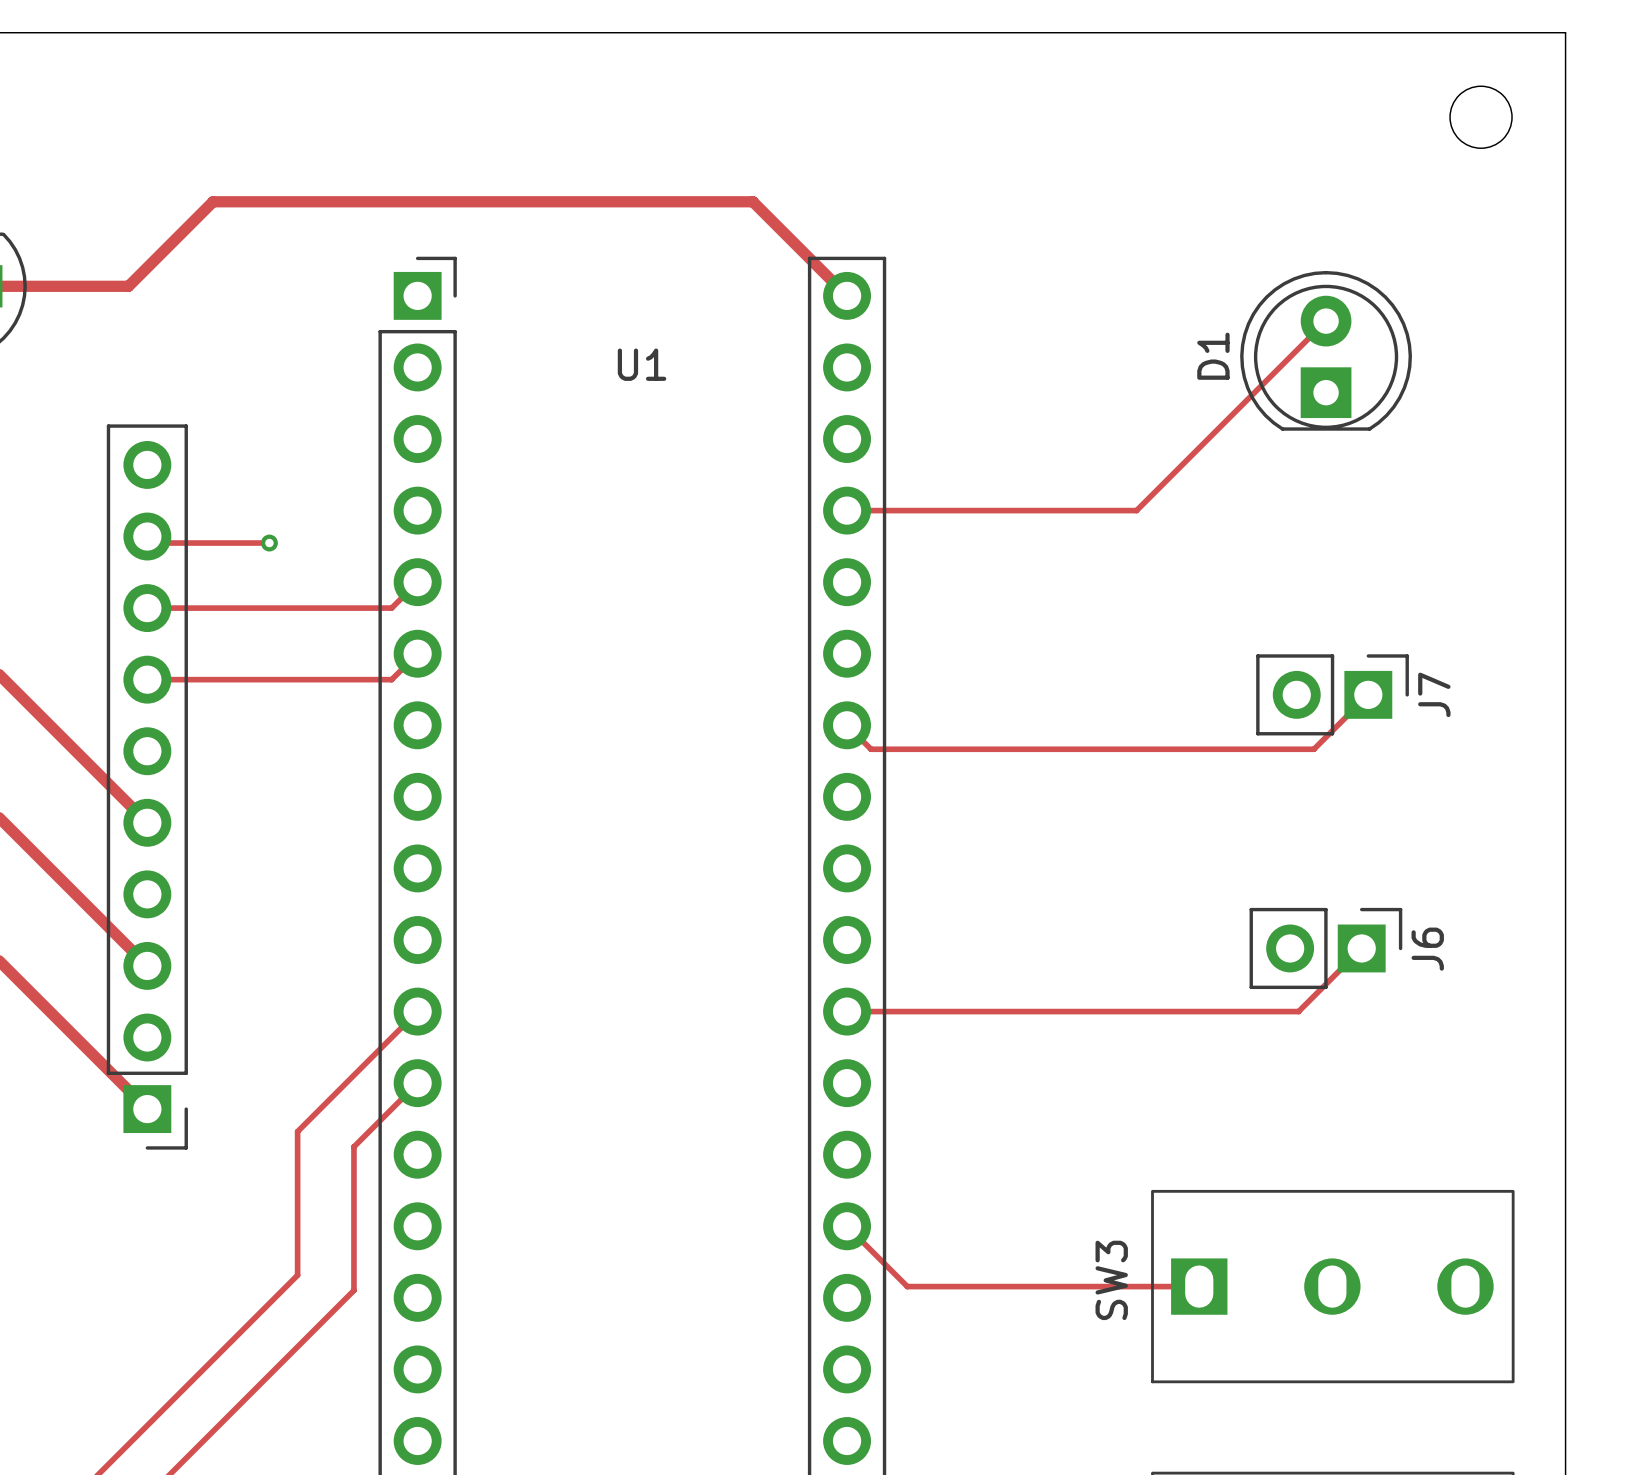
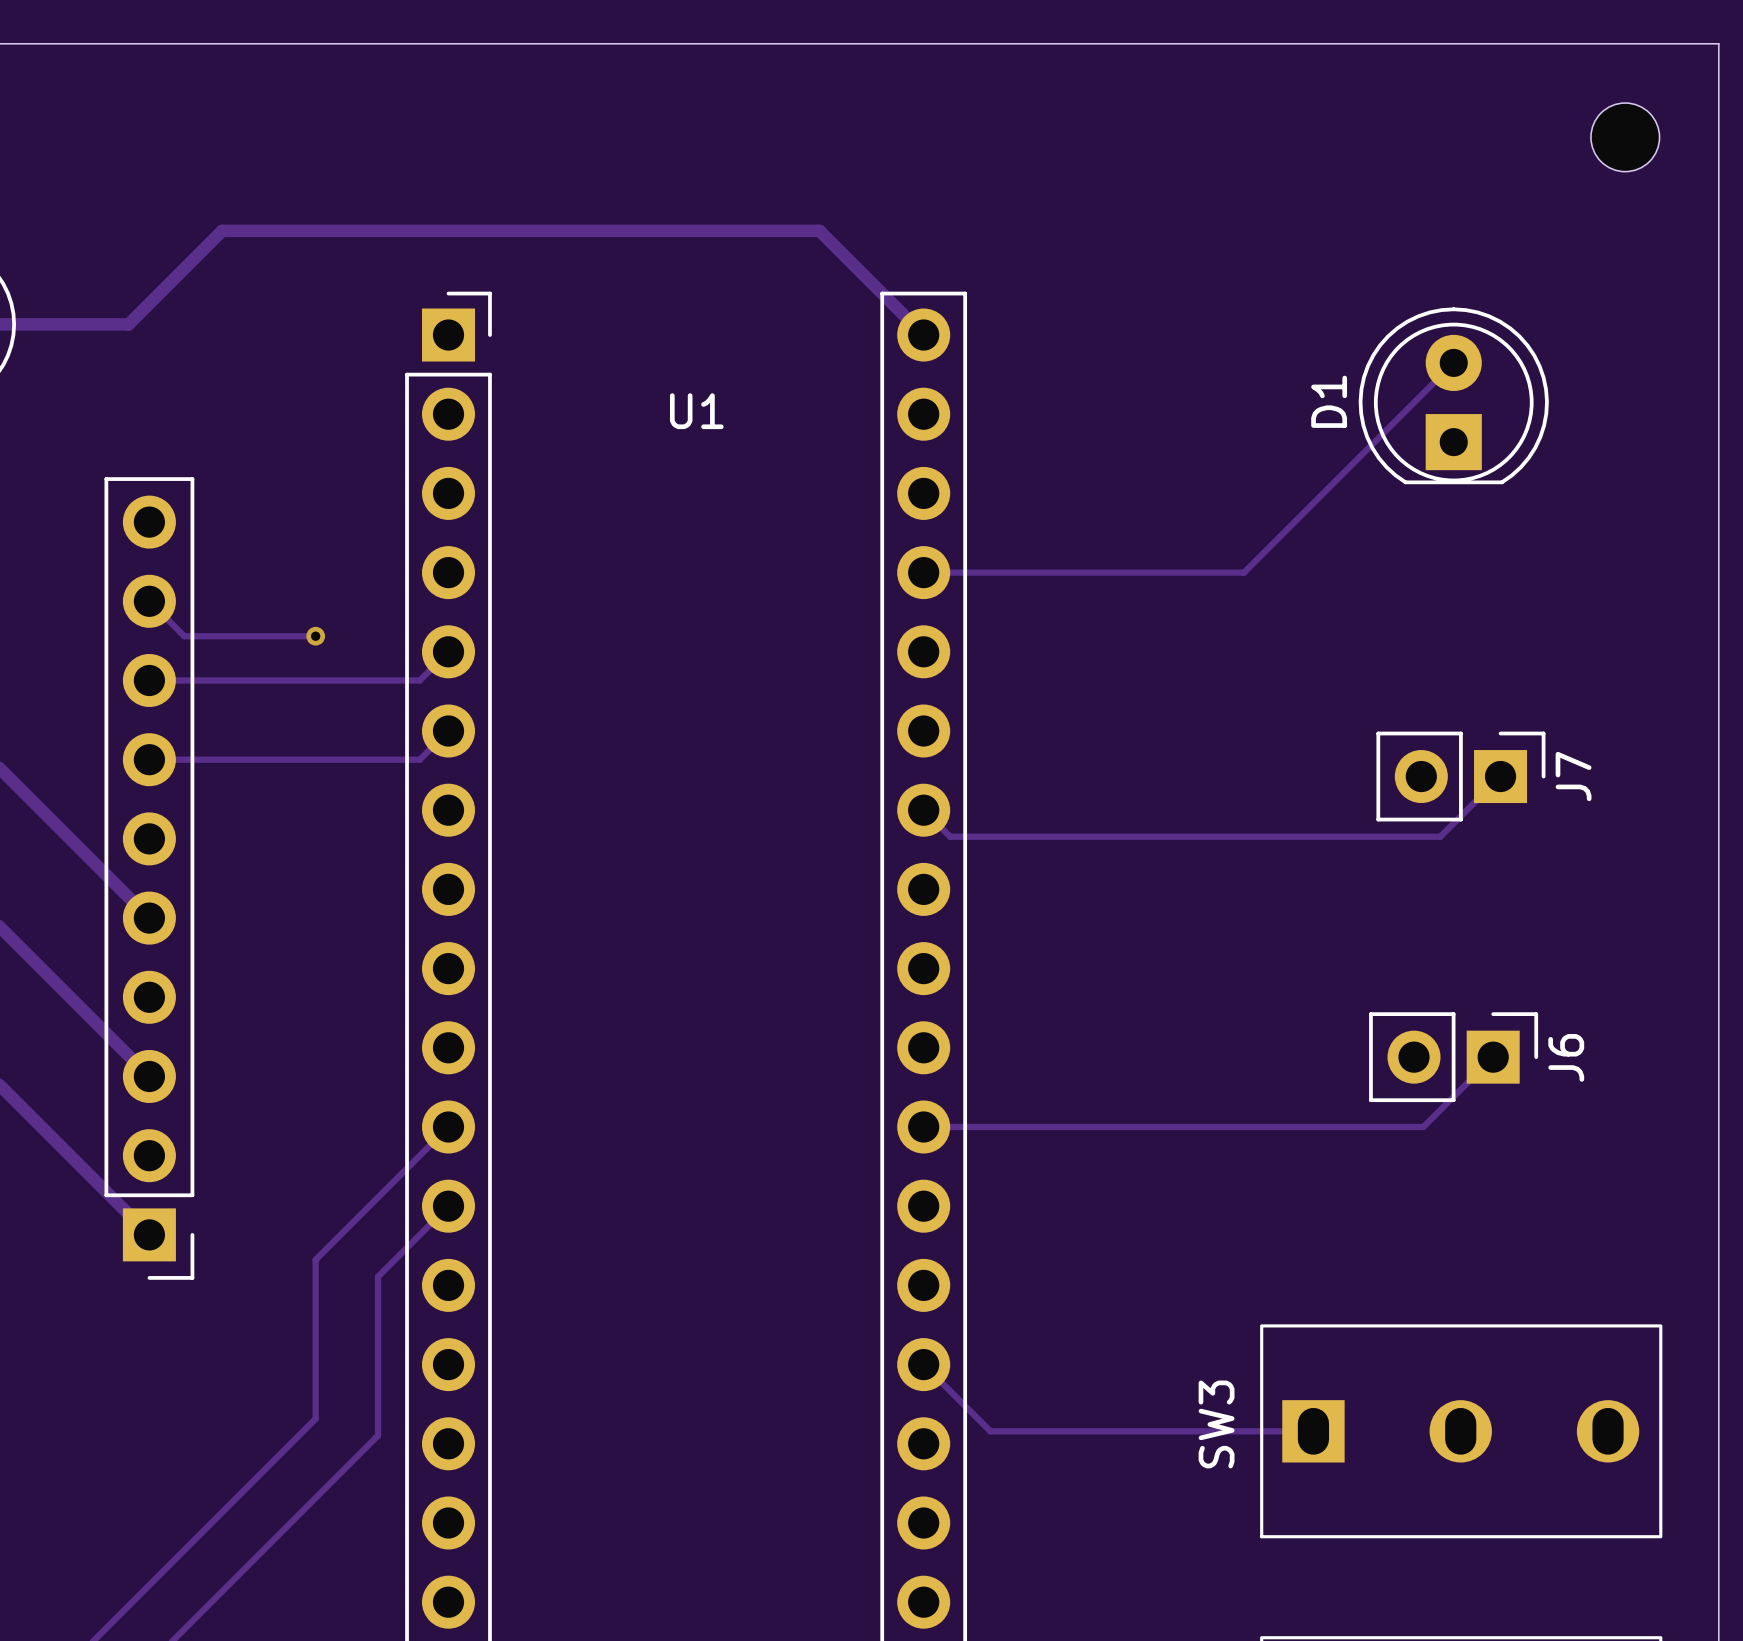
track: (153, 543) (269, 543) -> (156, 608) (184, 636) (315, 636)
via position: (269, 543) -> (315, 636)

